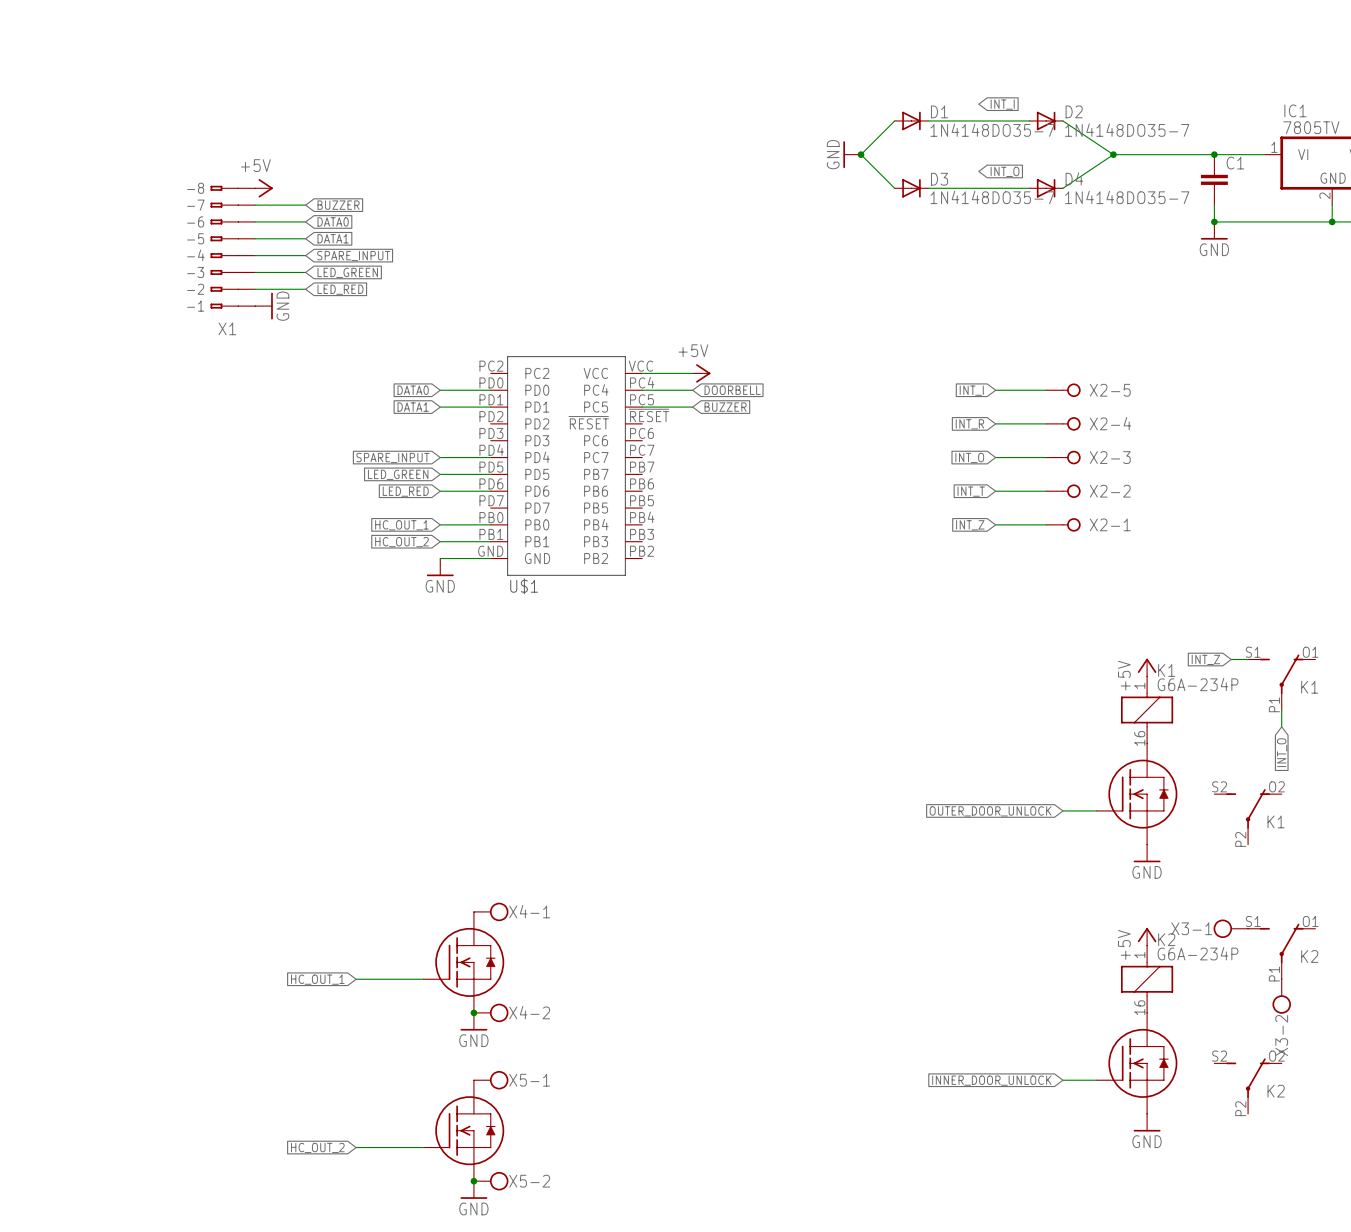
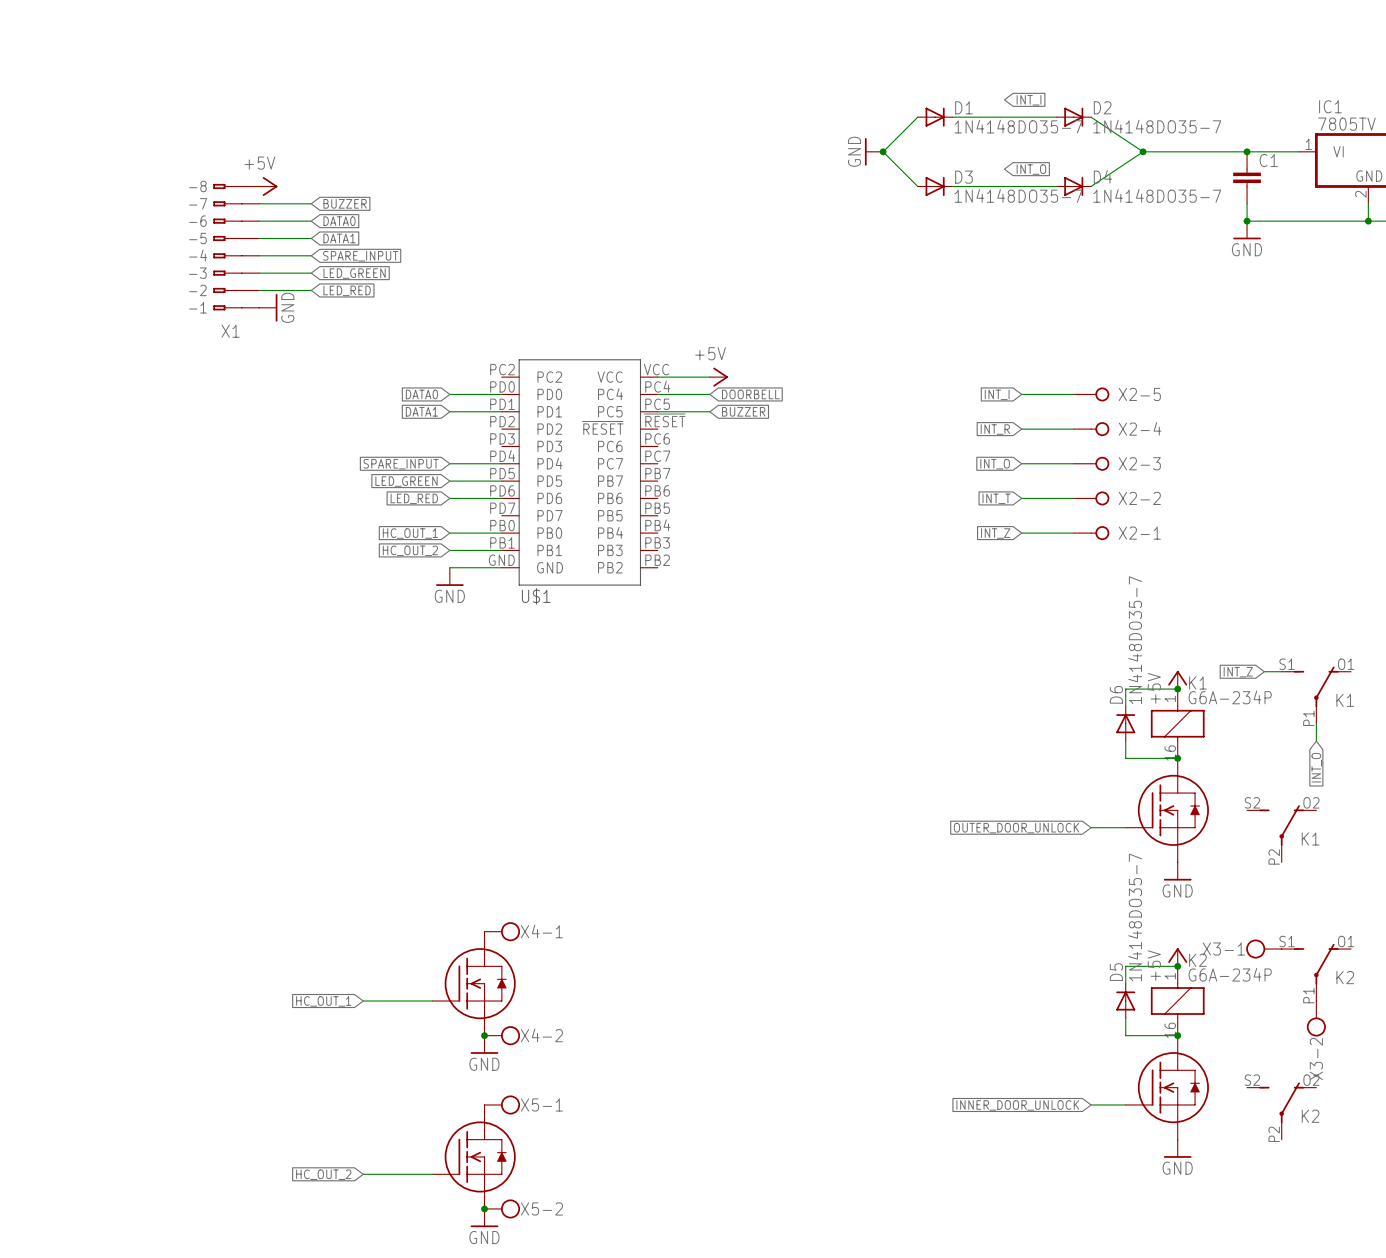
wire: none -> (1177, 689) (1125, 689) (1125, 706)
junction: none -> (1177, 689)
D6: none -> 1N4148DO35-7 (1125, 723)
wire: none -> (1125, 741) (1125, 758) (1177, 758)
junction: none -> (1177, 758)
wire: none -> (1177, 966) (1125, 966) (1125, 983)
junction: none -> (1177, 966)
D5: none -> 1N4148DO35-7 (1125, 1001)
wire: none -> (1125, 1018) (1125, 1035) (1177, 1035)
junction: none -> (1177, 1035)

